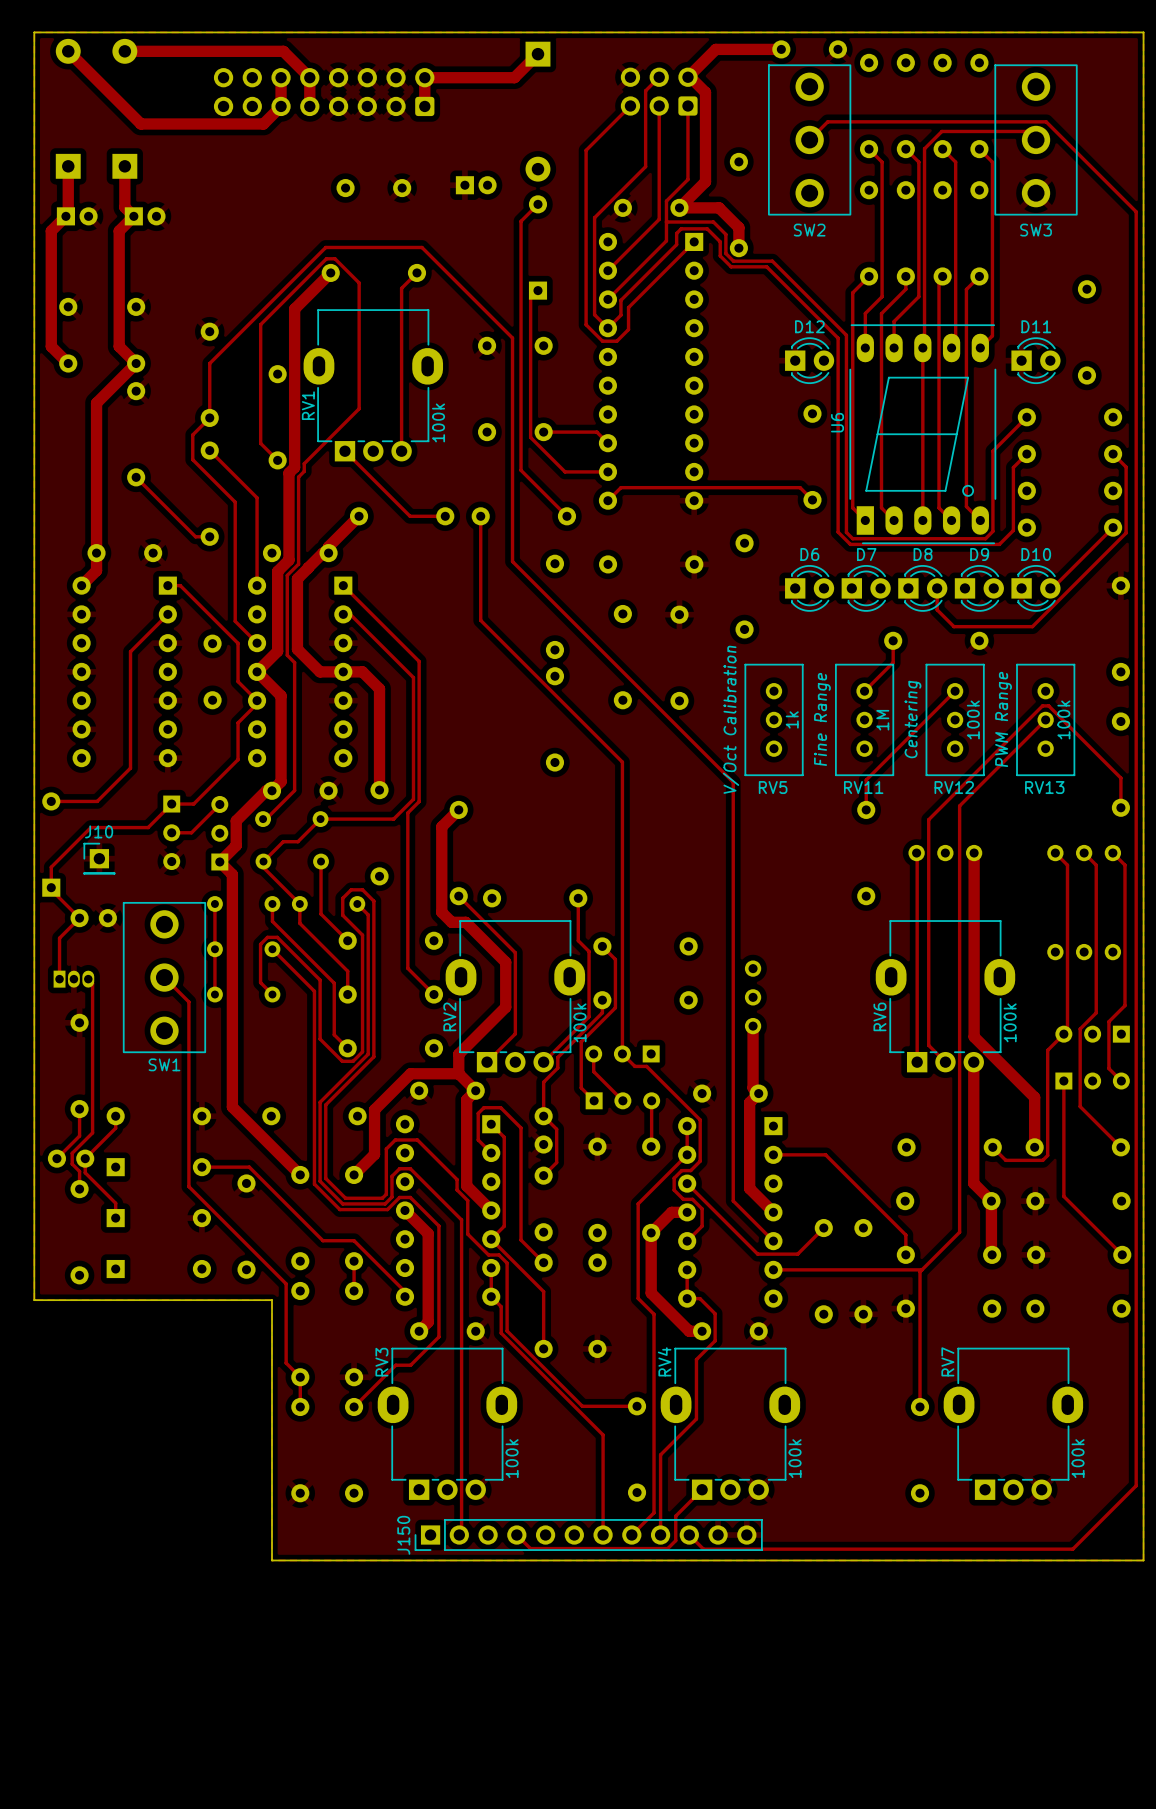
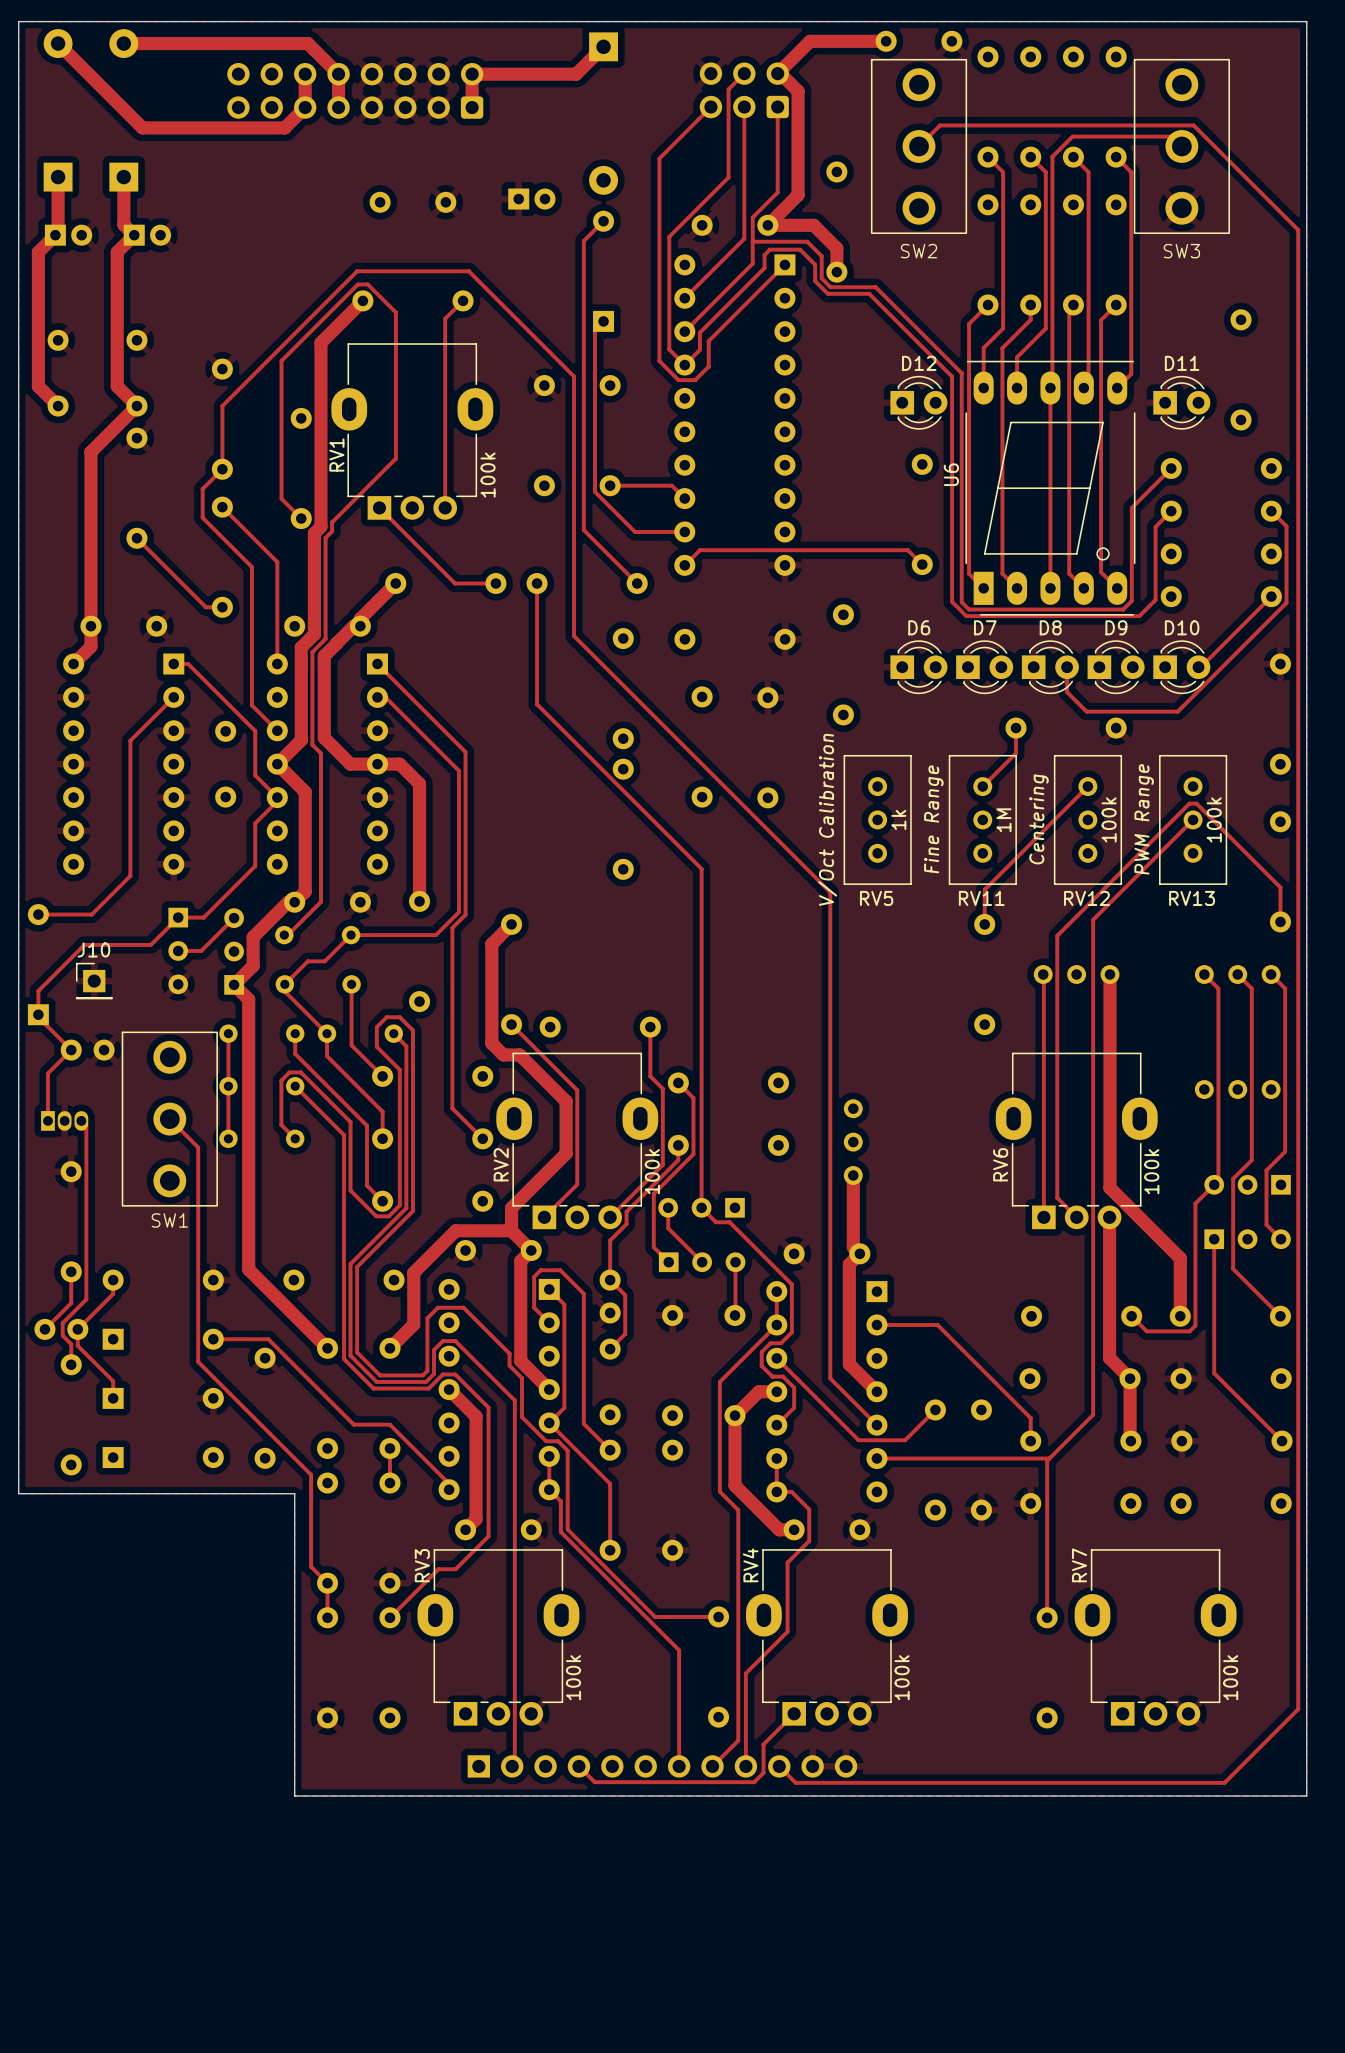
J150 side: top (588, 1535) -> bottom (662, 1766)

